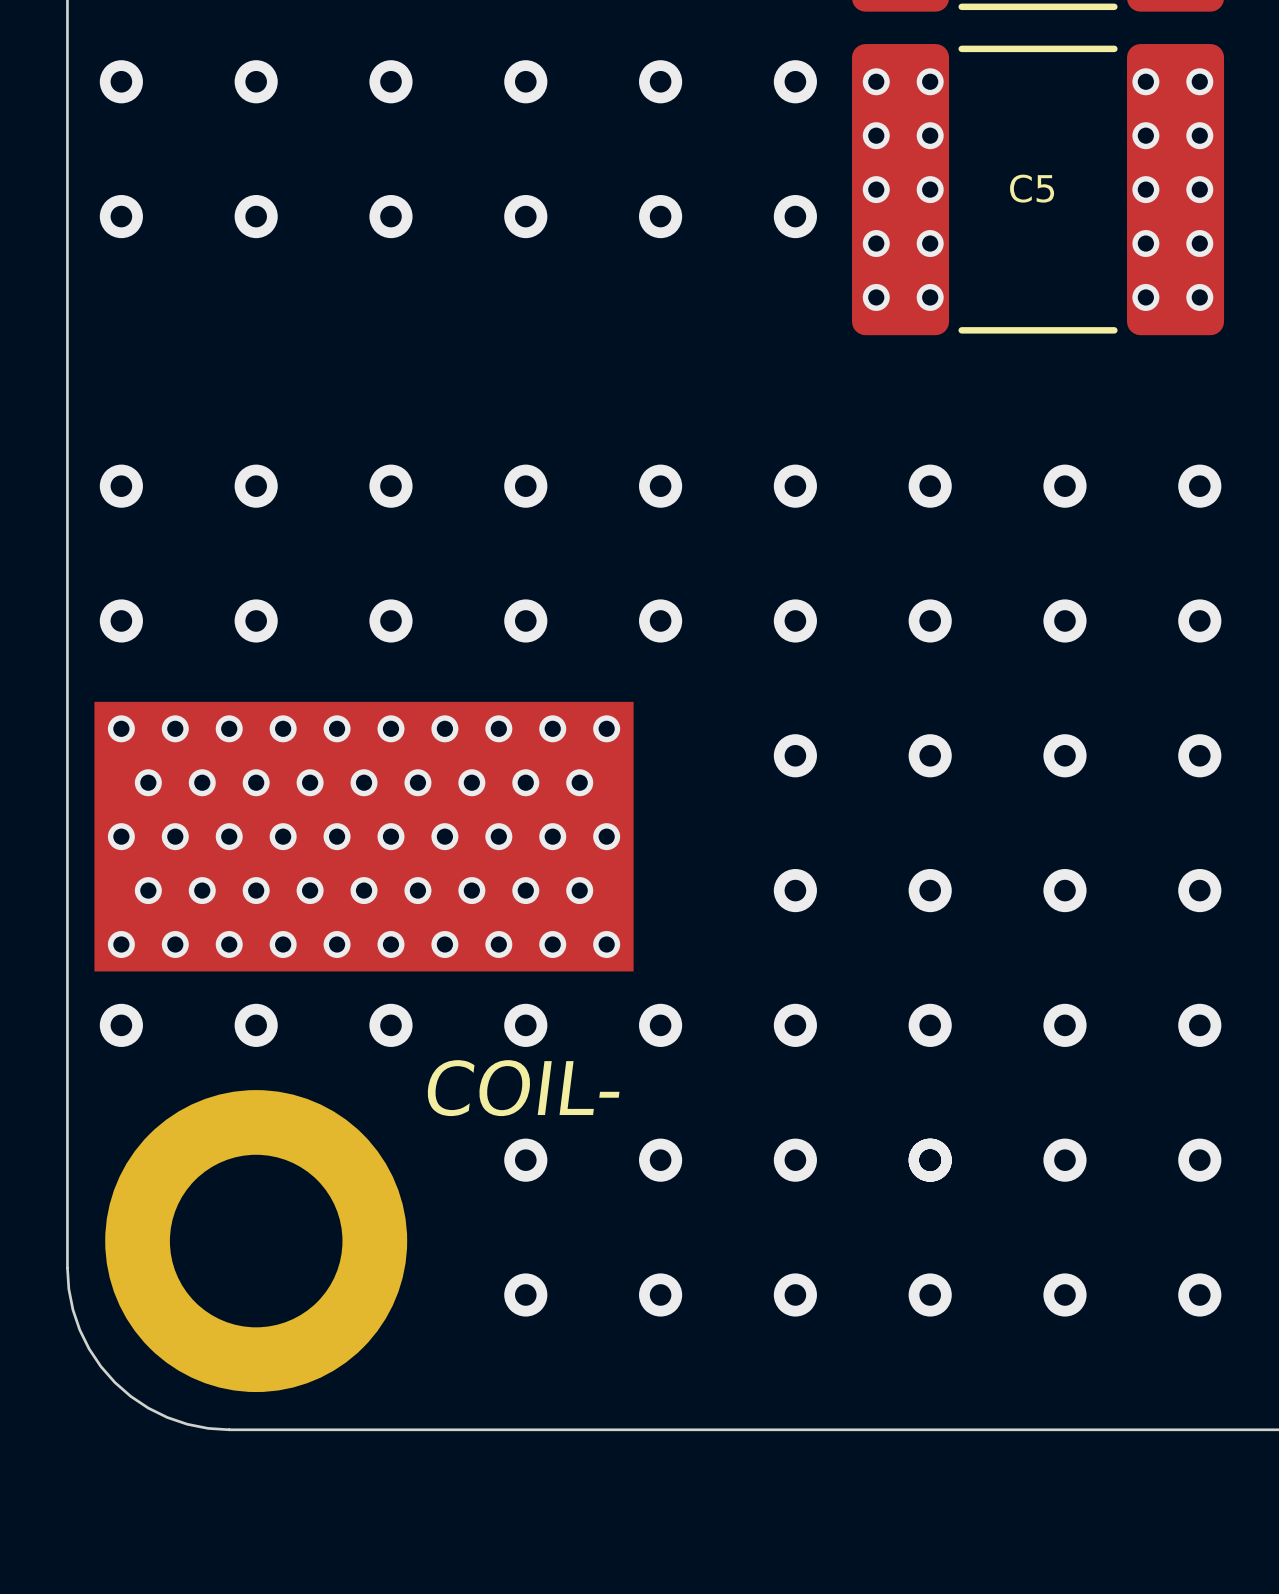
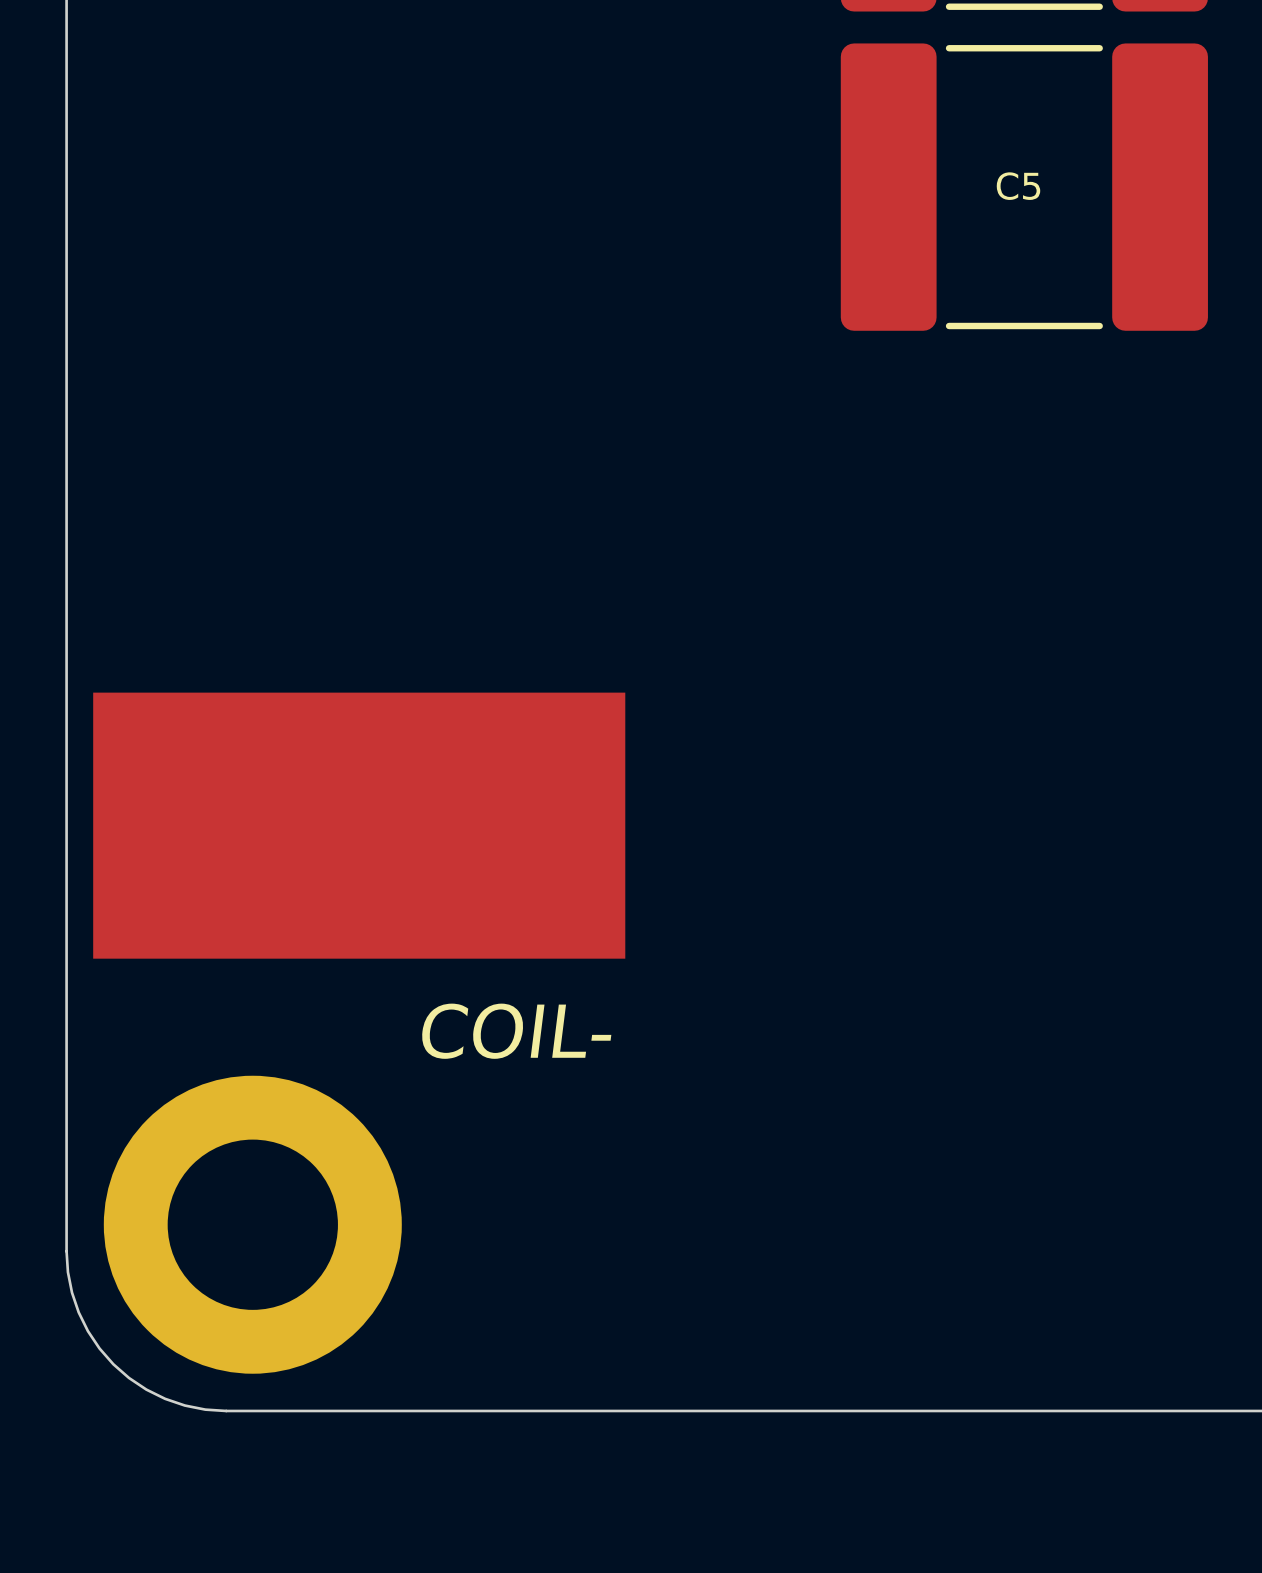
via: (121, 81) -> none
via: (256, 81) -> none
via: (390, 81) -> none
via: (525, 81) -> none
via: (660, 81) -> none
via: (795, 81) -> none
via: (876, 81) -> none
via: (930, 81) -> none
via: (1145, 81) -> none
via: (1199, 81) -> none
via: (876, 135) -> none
via: (930, 135) -> none
via: (1145, 135) -> none
via: (1199, 135) -> none
via: (876, 189) -> none
via: (930, 189) -> none
via: (1145, 189) -> none
via: (1199, 189) -> none
via: (121, 216) -> none
via: (256, 216) -> none
via: (390, 216) -> none
via: (525, 216) -> none
via: (660, 216) -> none
via: (795, 216) -> none
via: (876, 243) -> none
via: (930, 243) -> none
via: (1145, 243) -> none
via: (1199, 243) -> none
via: (876, 297) -> none
via: (930, 297) -> none
via: (1145, 297) -> none
via: (1199, 297) -> none
via: (121, 486) -> none
via: (256, 486) -> none
via: (390, 486) -> none
via: (525, 486) -> none
via: (660, 486) -> none
via: (795, 486) -> none
via: (930, 486) -> none
via: (1064, 486) -> none
via: (1199, 486) -> none
via: (121, 620) -> none
via: (256, 620) -> none
via: (390, 620) -> none
via: (525, 620) -> none
via: (660, 620) -> none
via: (795, 620) -> none
via: (930, 620) -> none
via: (1064, 620) -> none
via: (1199, 620) -> none
via: (121, 728) -> none
via: (175, 728) -> none
via: (229, 728) -> none
via: (283, 728) -> none
via: (337, 728) -> none
via: (390, 728) -> none
via: (444, 728) -> none
via: (498, 728) -> none
via: (552, 728) -> none
via: (606, 728) -> none
via: (795, 755) -> none
via: (930, 755) -> none
via: (1064, 755) -> none
via: (1199, 755) -> none
via: (148, 782) -> none
via: (202, 782) -> none
via: (256, 782) -> none
via: (310, 782) -> none
via: (364, 782) -> none
via: (417, 782) -> none
via: (471, 782) -> none
via: (525, 782) -> none
via: (579, 782) -> none
via: (121, 836) -> none
via: (175, 836) -> none
via: (229, 836) -> none
via: (283, 836) -> none
via: (337, 836) -> none
via: (390, 836) -> none
via: (444, 836) -> none
via: (498, 836) -> none
via: (552, 836) -> none
via: (606, 836) -> none
via: (148, 890) -> none
via: (202, 890) -> none
via: (256, 890) -> none
via: (310, 890) -> none
via: (364, 890) -> none
via: (417, 890) -> none
via: (471, 890) -> none
via: (525, 890) -> none
via: (579, 890) -> none
via: (795, 890) -> none
via: (930, 890) -> none
via: (1064, 890) -> none
via: (1199, 890) -> none
via: (121, 944) -> none
via: (175, 944) -> none
via: (229, 944) -> none
via: (283, 944) -> none
via: (337, 944) -> none
via: (390, 944) -> none
via: (444, 944) -> none
via: (498, 944) -> none
via: (552, 944) -> none
via: (606, 944) -> none
via: (121, 1025) -> none
via: (256, 1025) -> none
via: (390, 1025) -> none
via: (525, 1025) -> none
via: (660, 1025) -> none
via: (795, 1025) -> none
via: (930, 1025) -> none
via: (1064, 1025) -> none
via: (1199, 1025) -> none
text position: COIL- (522, 1088) -> COIL- (516, 1031)
via: (525, 1160) -> none
via: (660, 1160) -> none
via: (795, 1160) -> none
via: (930, 1160) -> none
via: (1064, 1160) -> none
via: (1199, 1160) -> none
via: (525, 1294) -> none
via: (660, 1294) -> none
via: (795, 1294) -> none
via: (930, 1294) -> none
via: (1064, 1294) -> none
via: (1199, 1294) -> none

